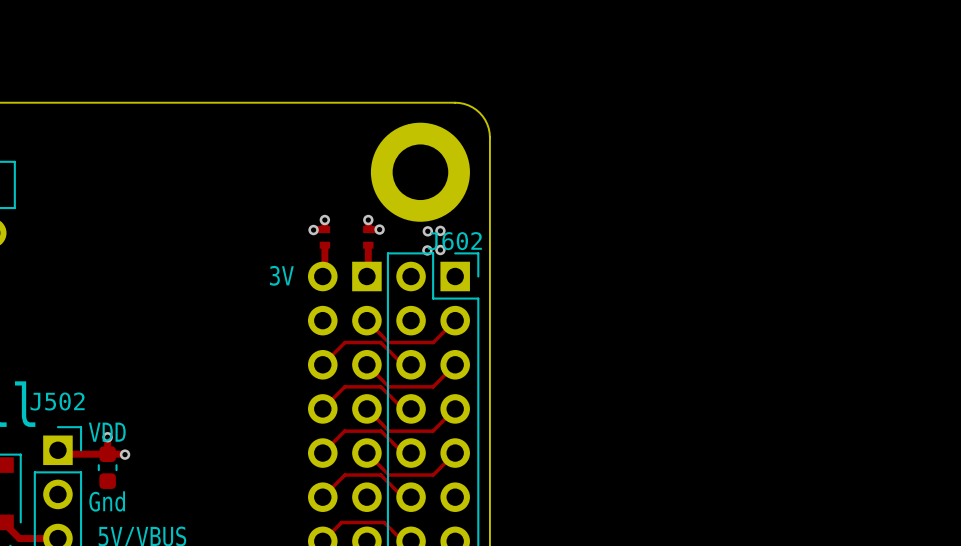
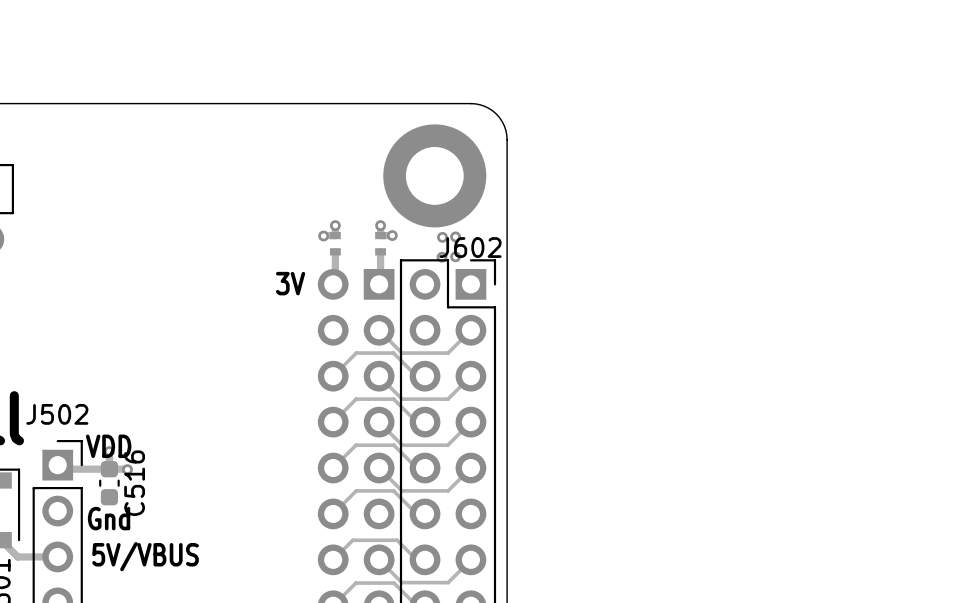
C516 name: none -> C516 (134, 483)

